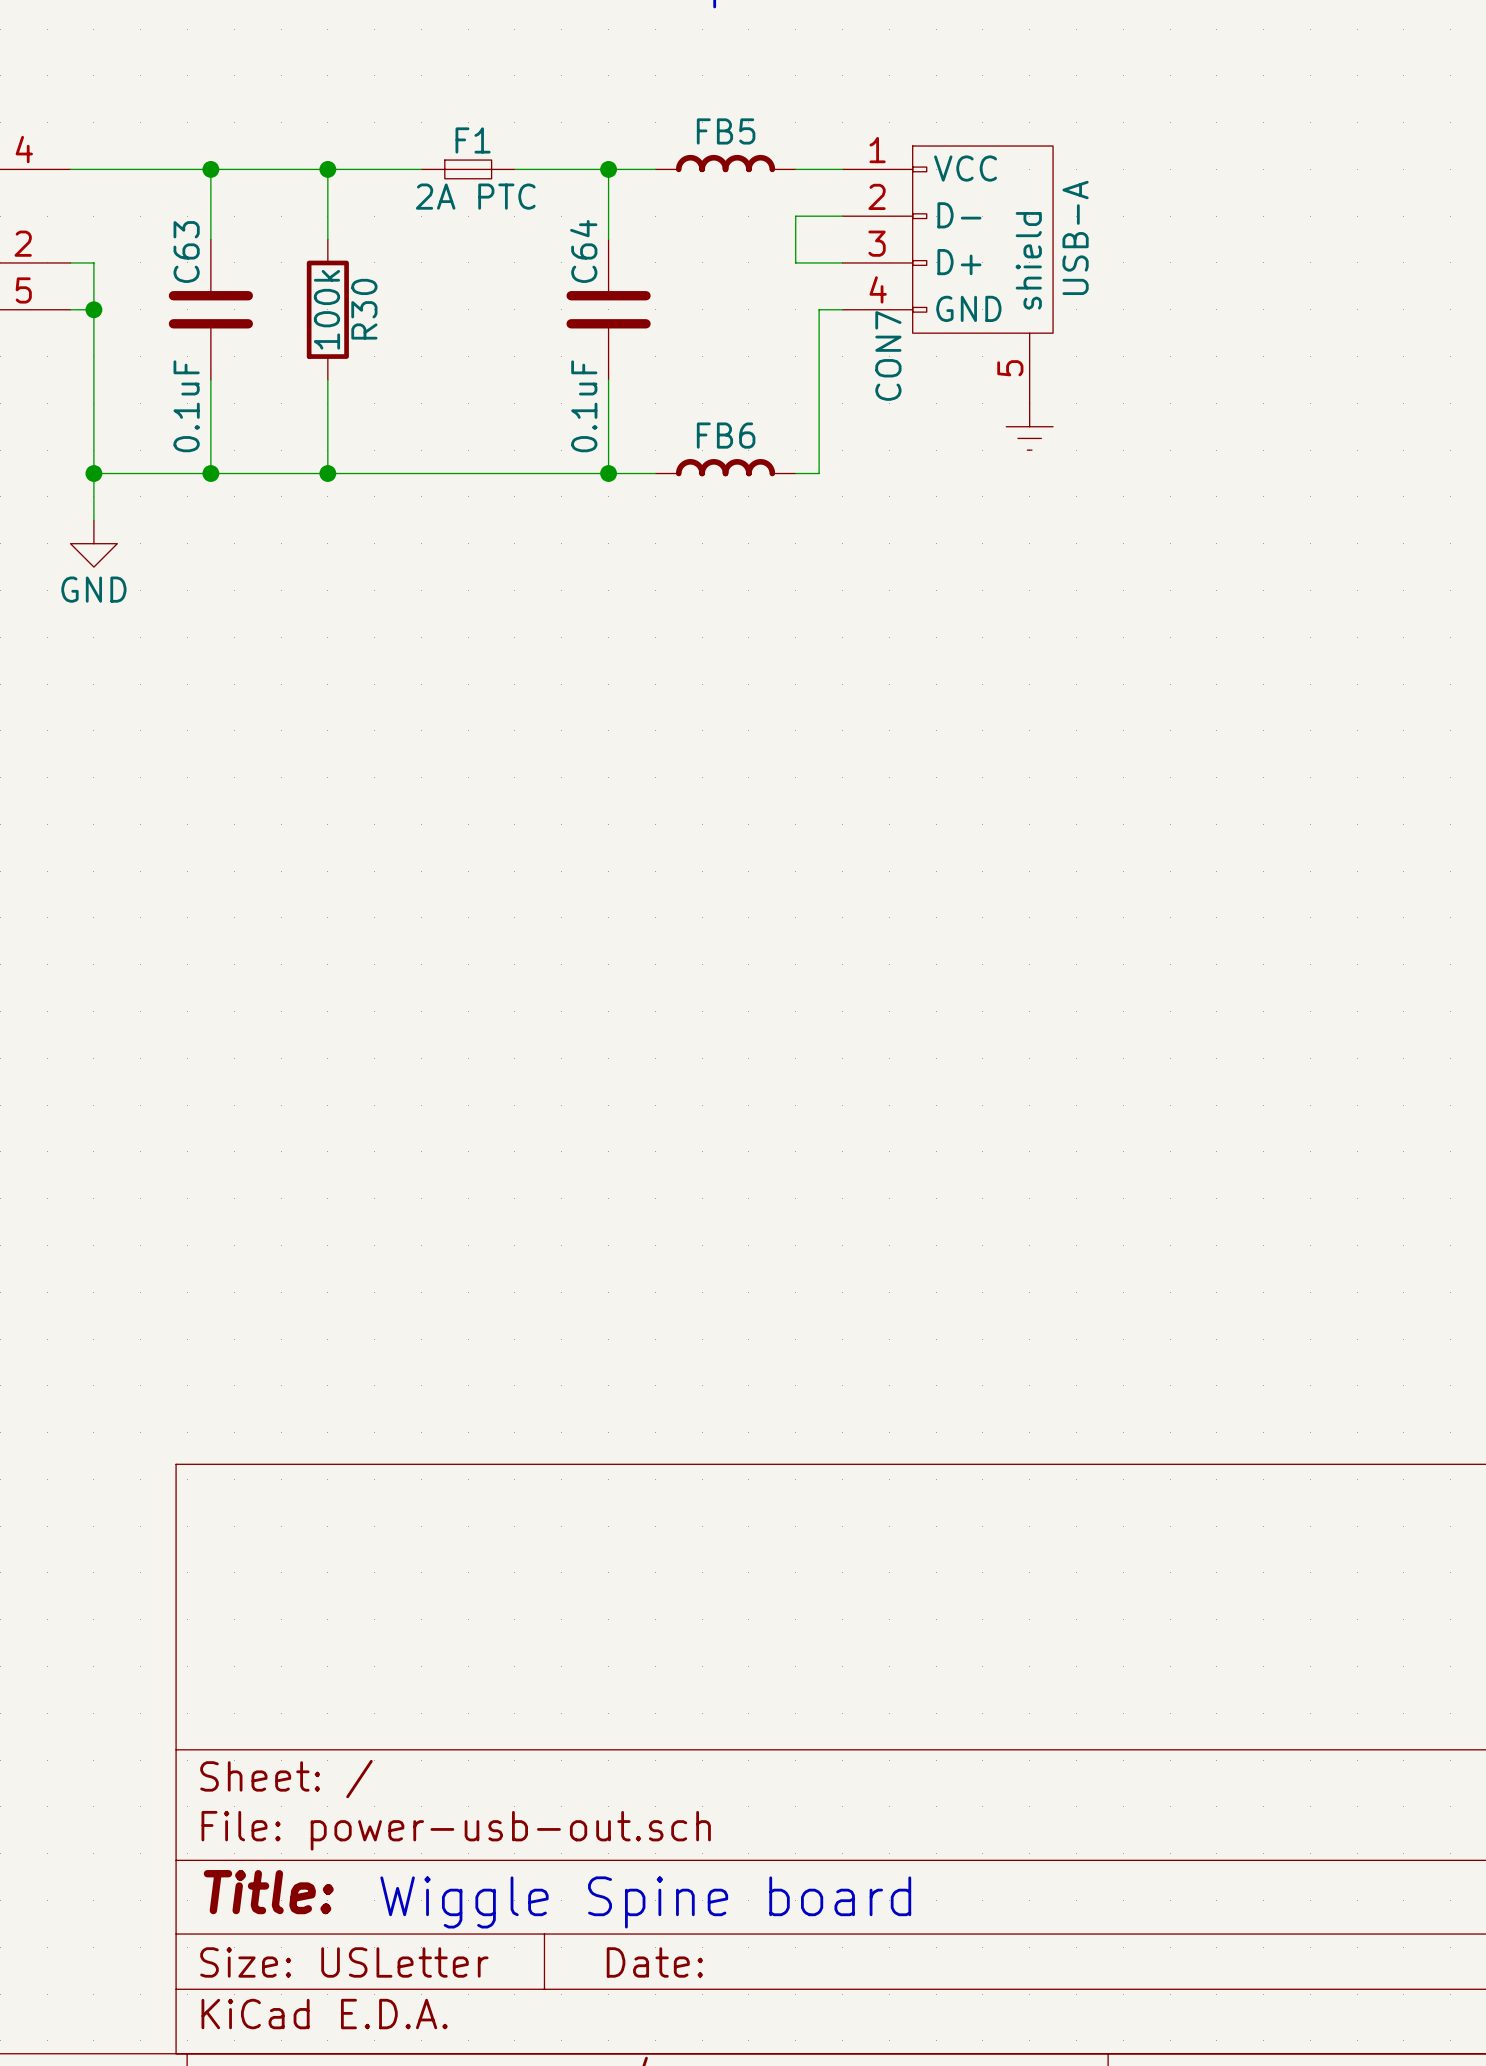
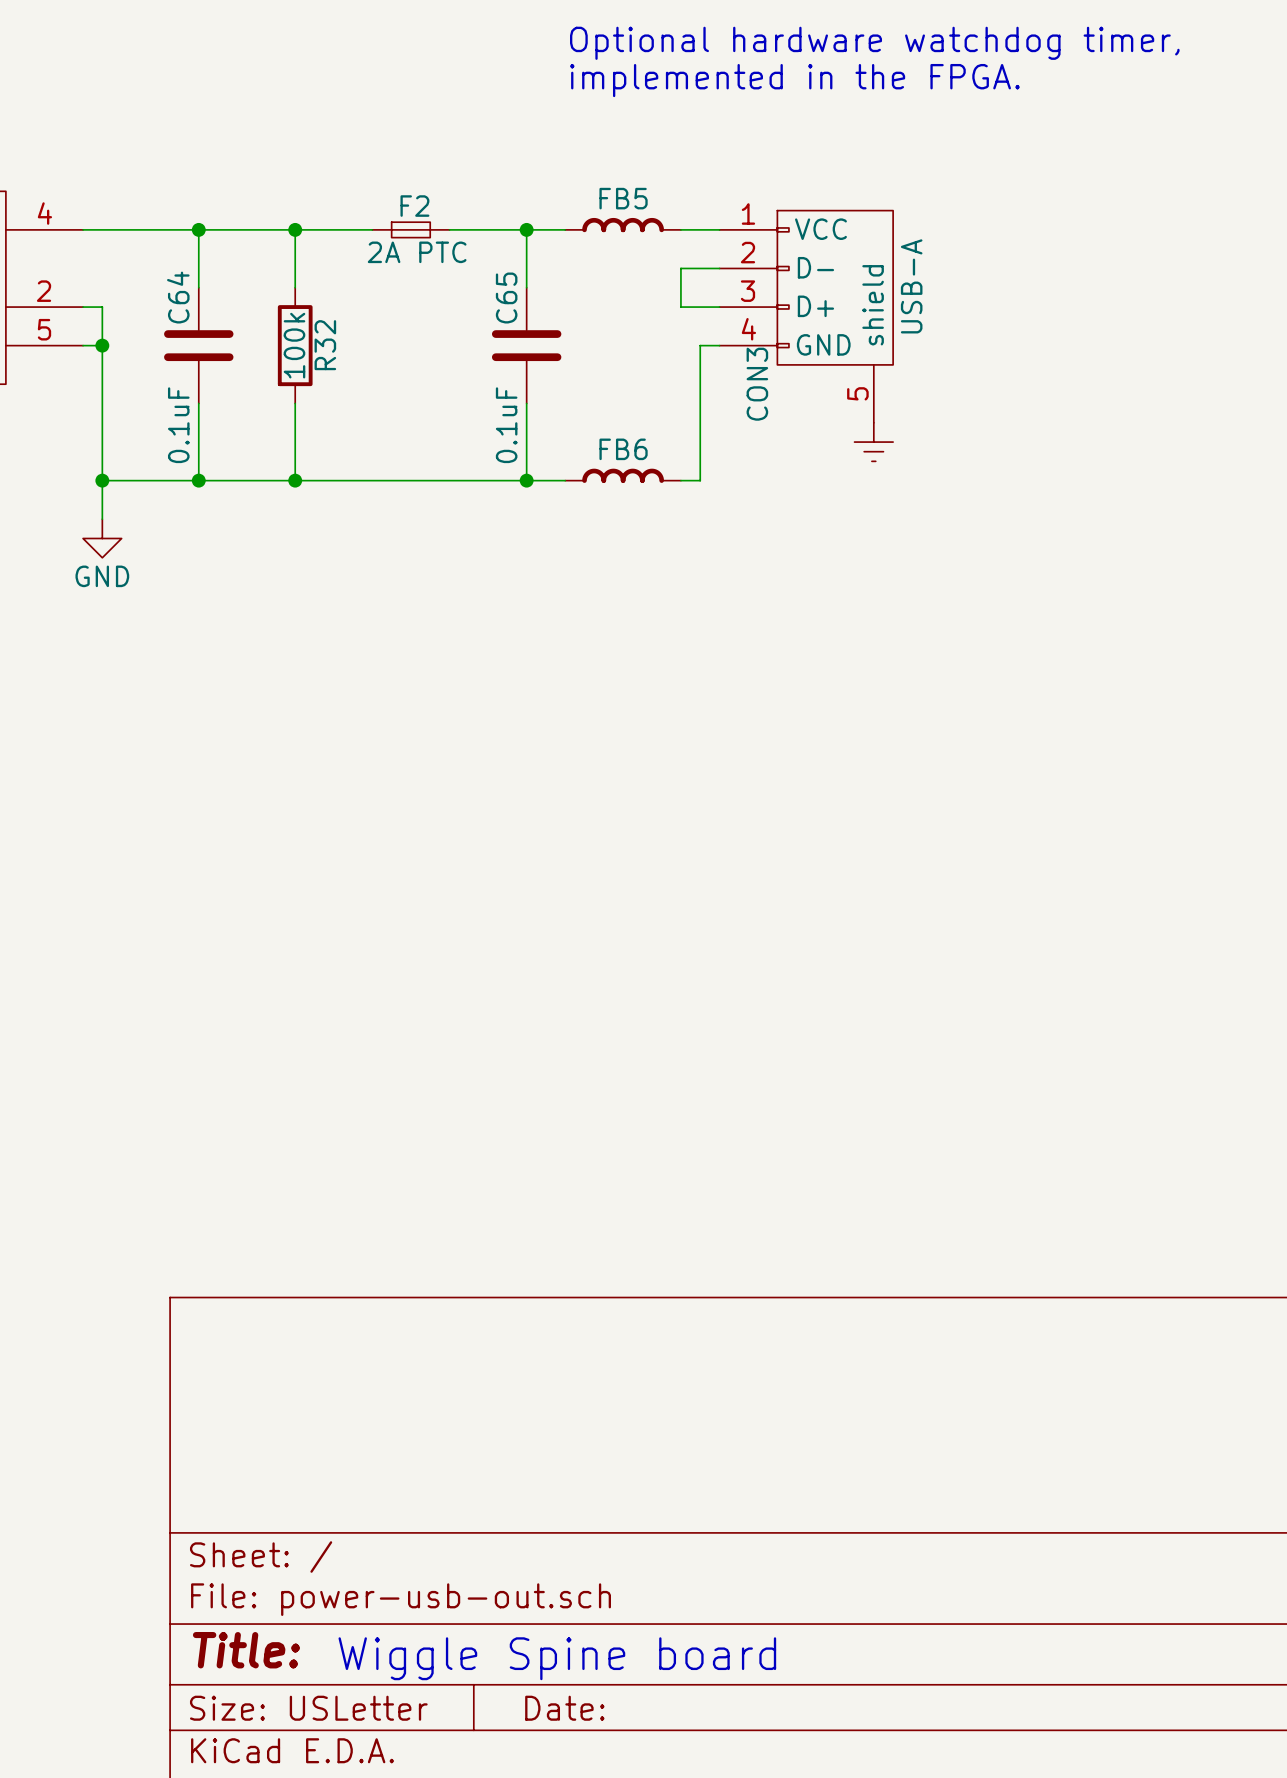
F1 name: F1 (473, 140) -> F2 (414, 206)
C64 name: C64 (583, 251) -> C65 (506, 298)
C63 name: C63 (186, 252) -> C64 (178, 297)
R30 name: R30 (364, 309) -> R32 (325, 345)
CON7 name: CON7 (888, 355) -> CON3 (757, 384)

